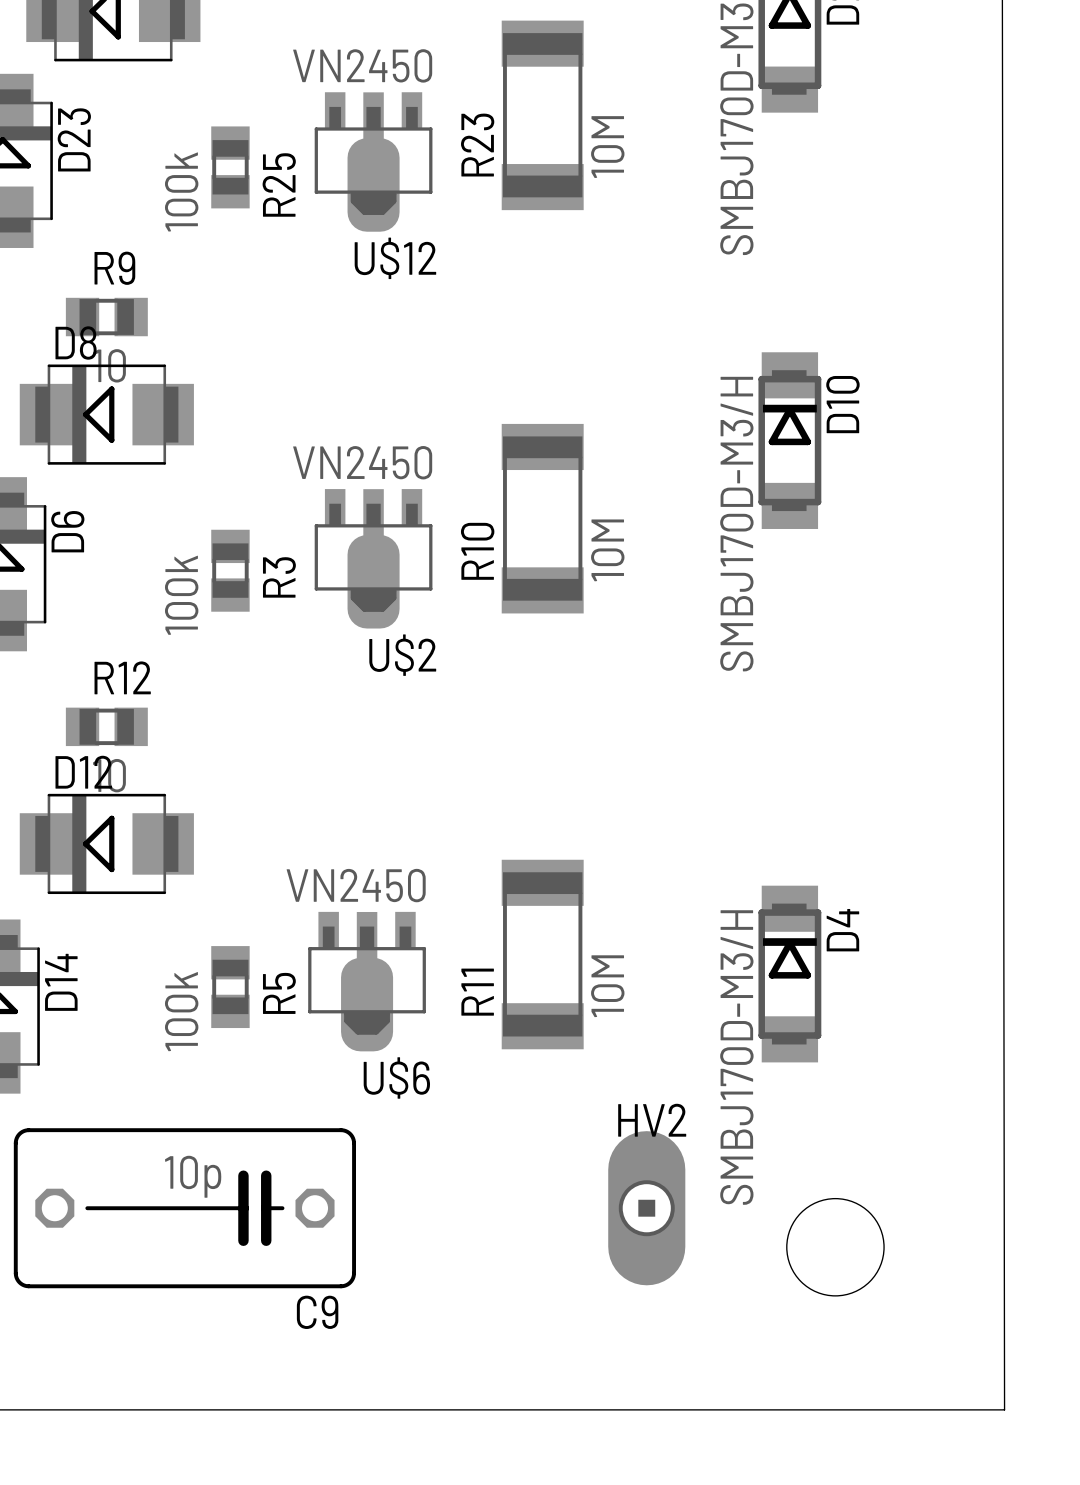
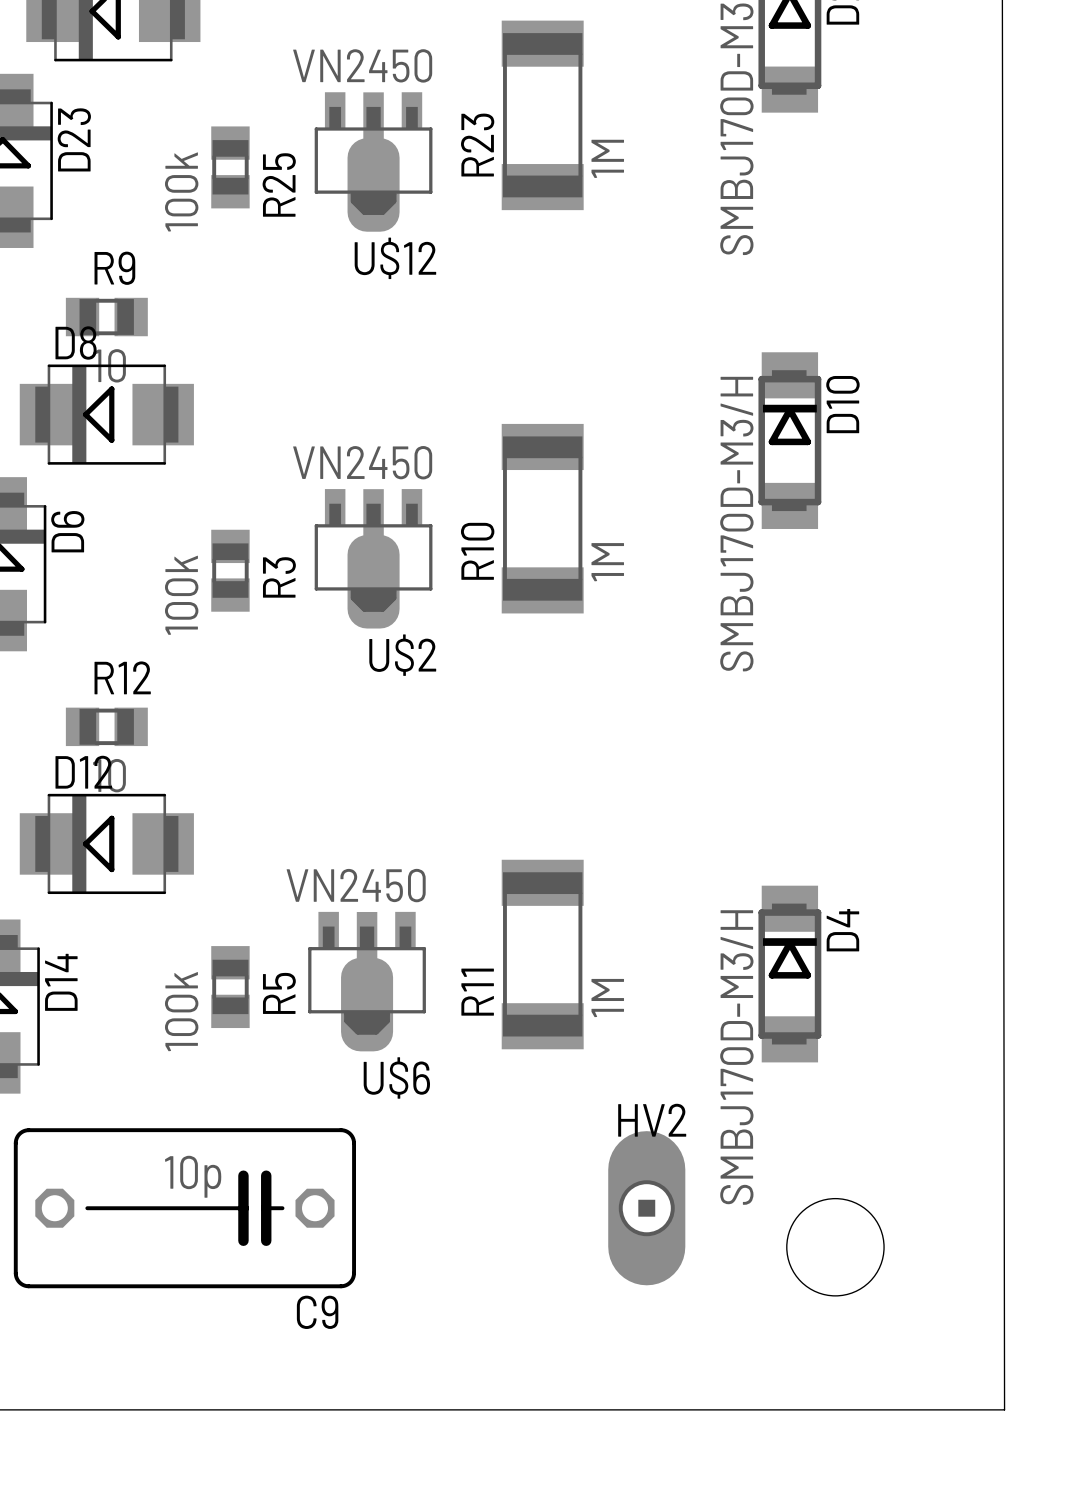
R23 value: 10M (607, 147) -> 1M (607, 158)
R10 value: 10M (607, 550) -> 1M (607, 562)
R11 value: 10M (607, 986) -> 1M (607, 998)

